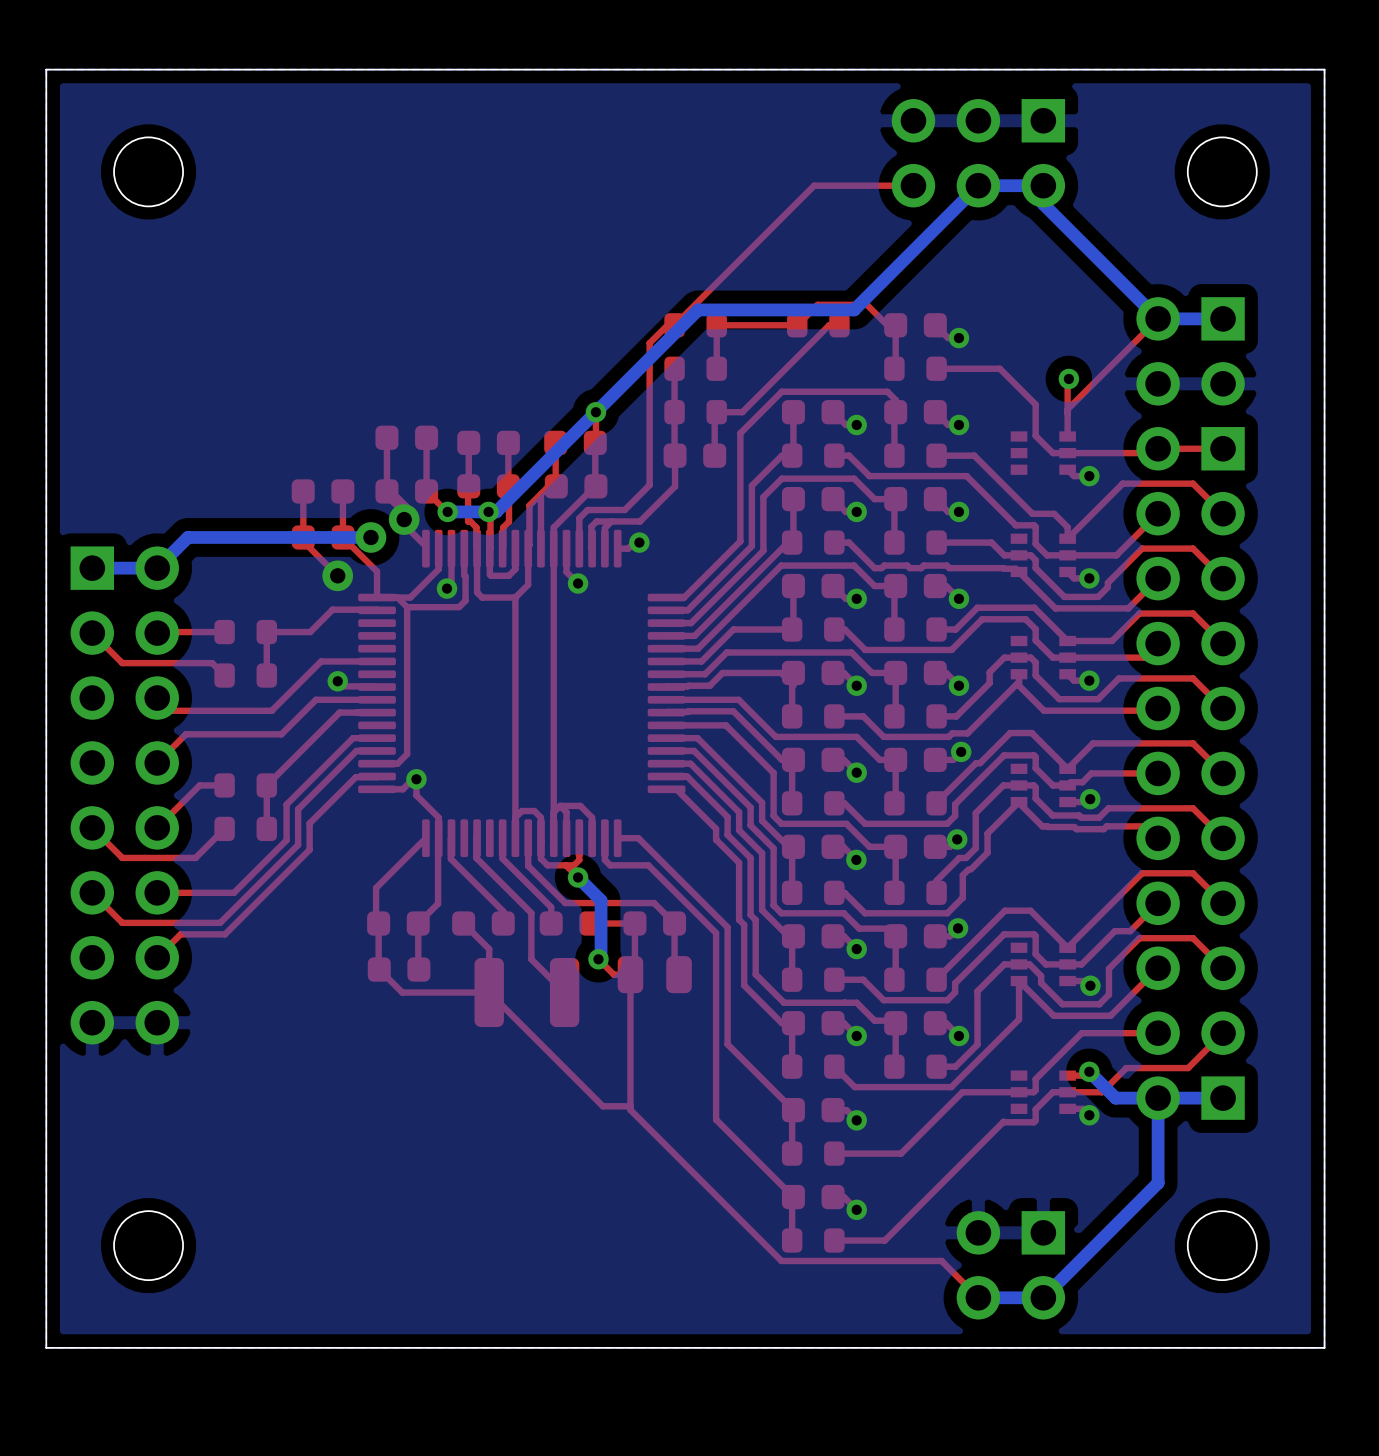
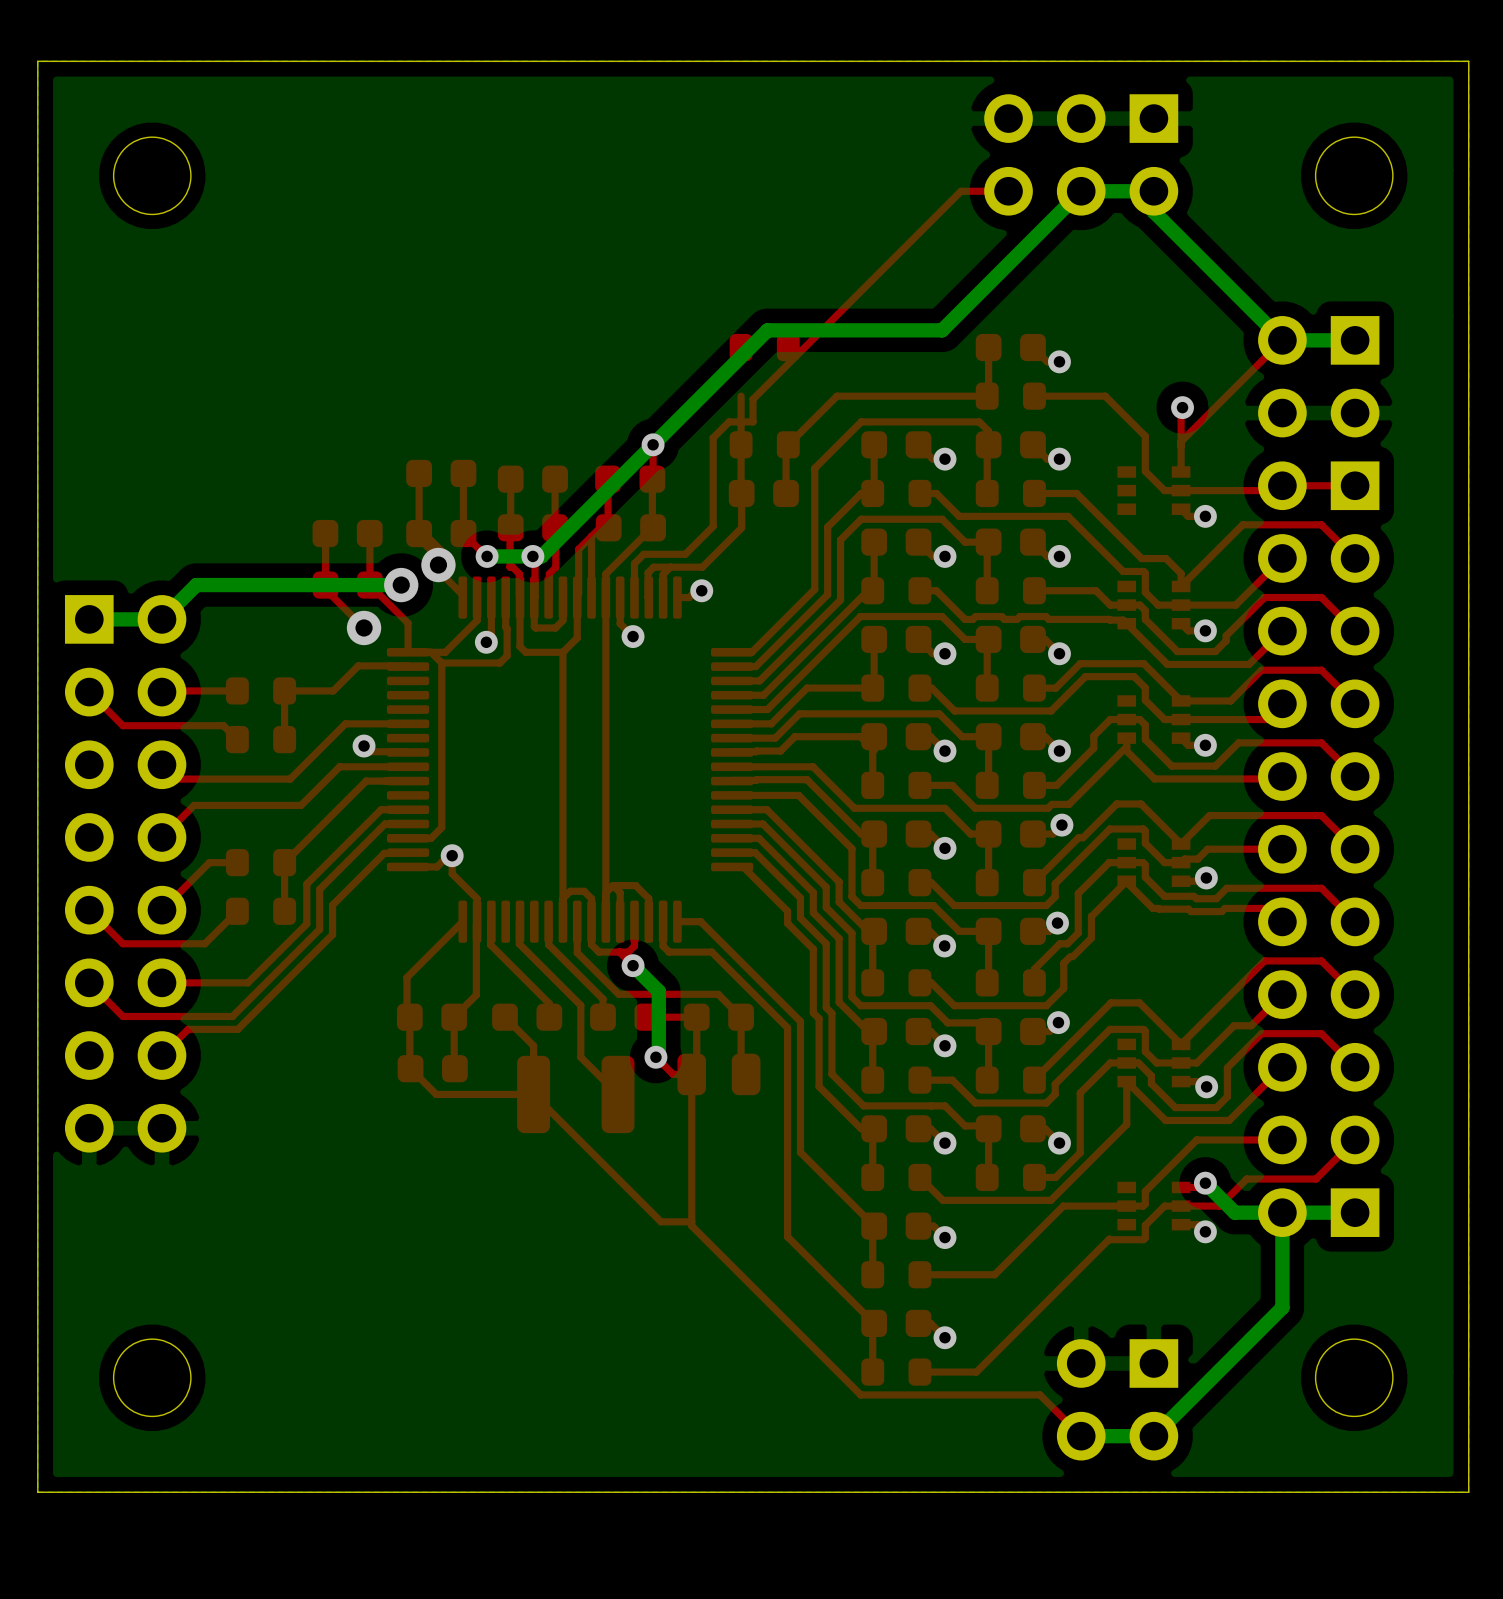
top track: (871, 185) (814, 185) (674, 325) (667, 325) (649, 343) (649, 406) -> (961, 191) (753, 399) (753, 421) (729, 421) (713, 437)
part: (818, 325) -> none
top track: (839, 325) (829, 325) (742, 412) (716, 412) -> (987, 396) (836, 396) (788, 444)
top track: (895, 325) (887, 325) (866, 304) (817, 304) (797, 325) (716, 325) (716, 368) -> none
part: (695, 368) -> none

